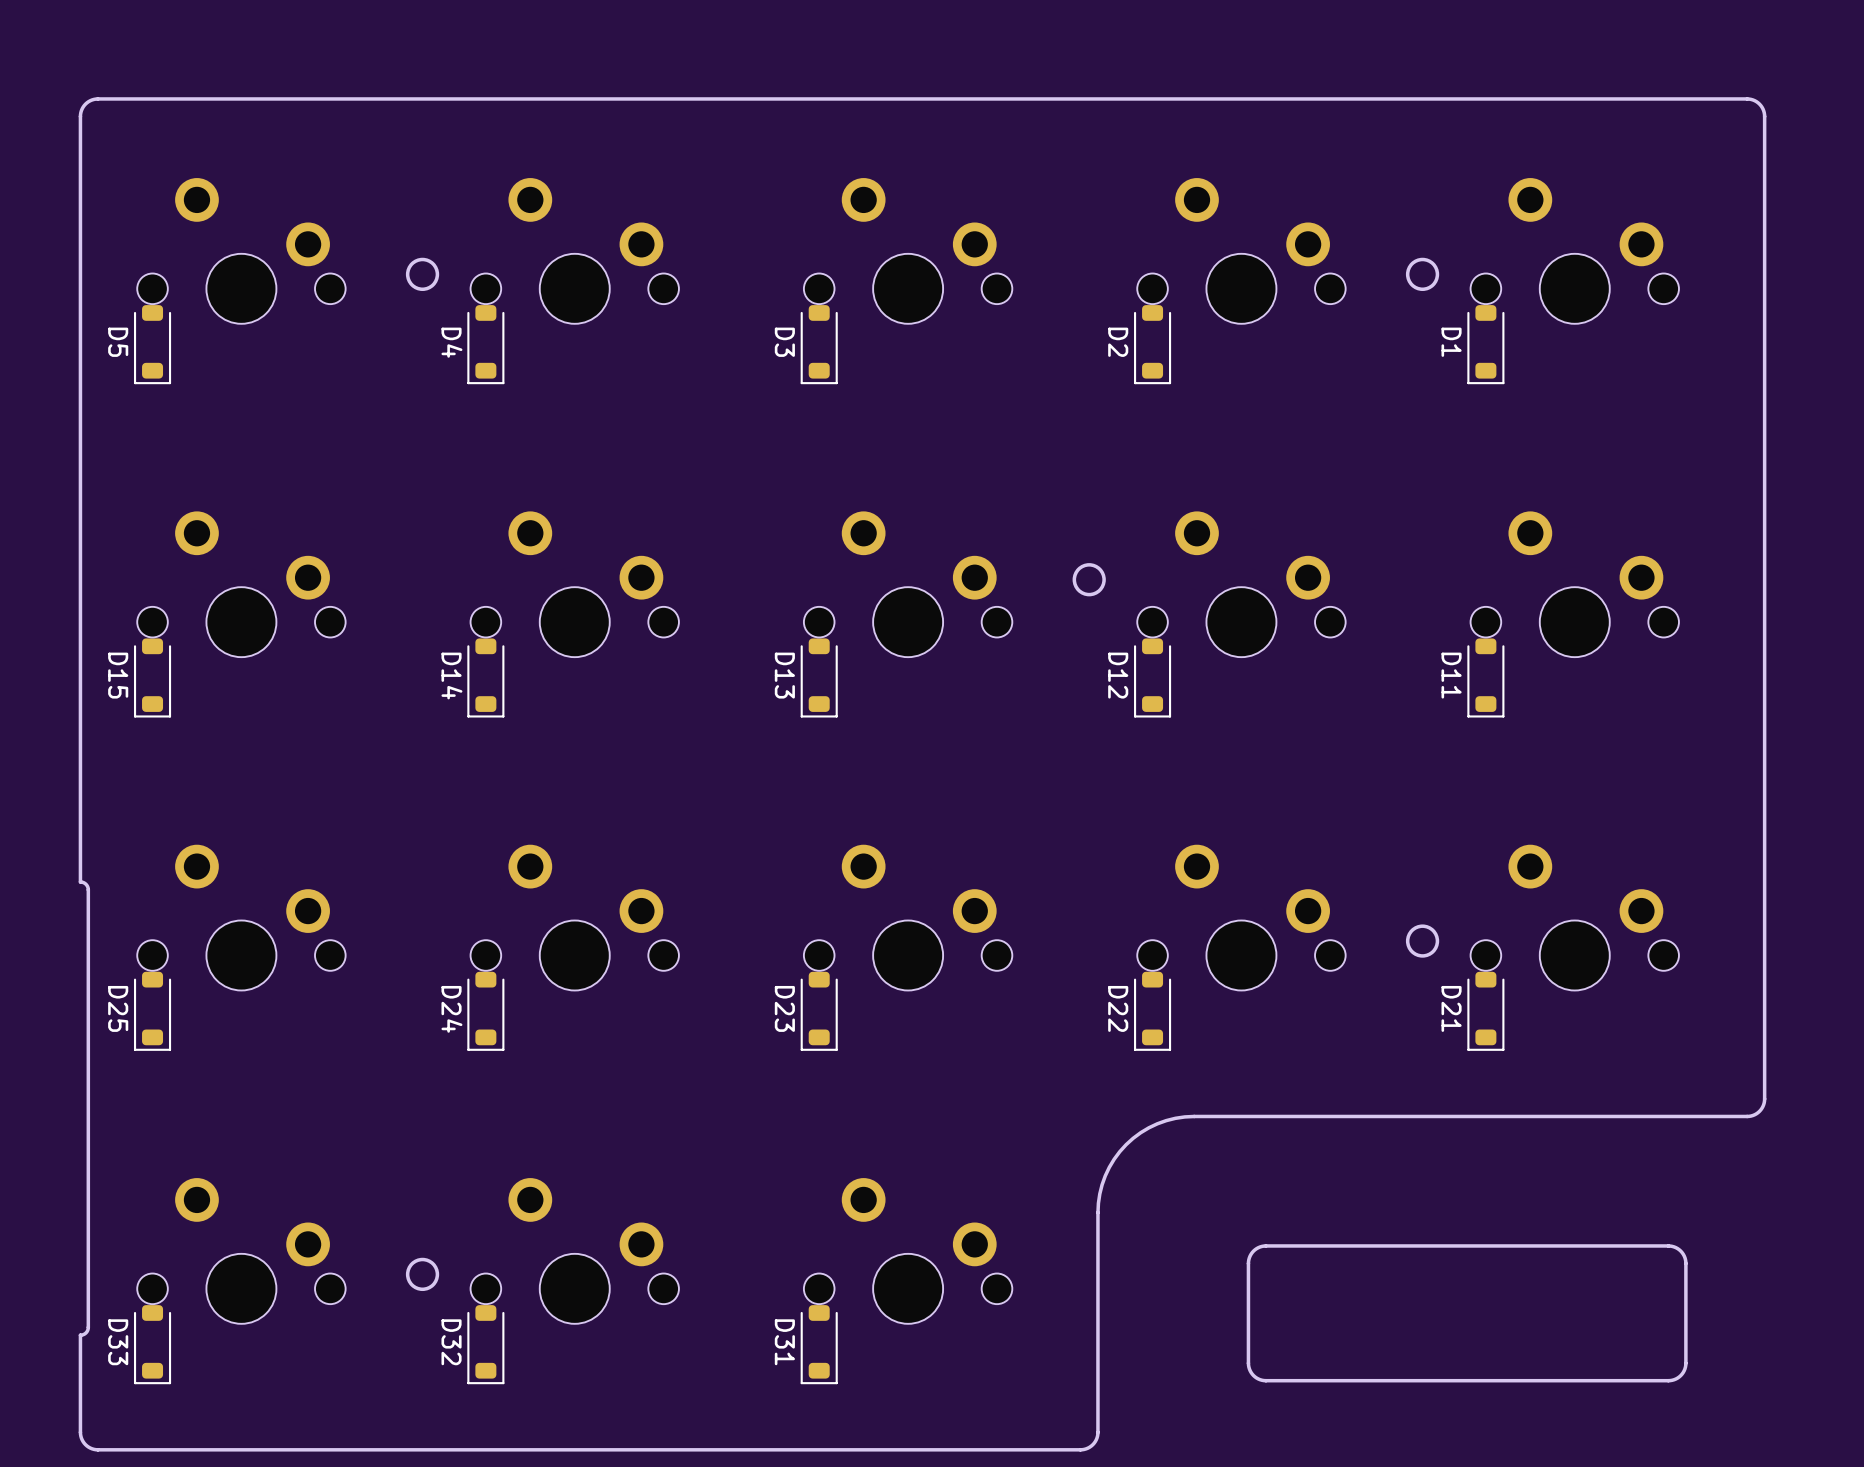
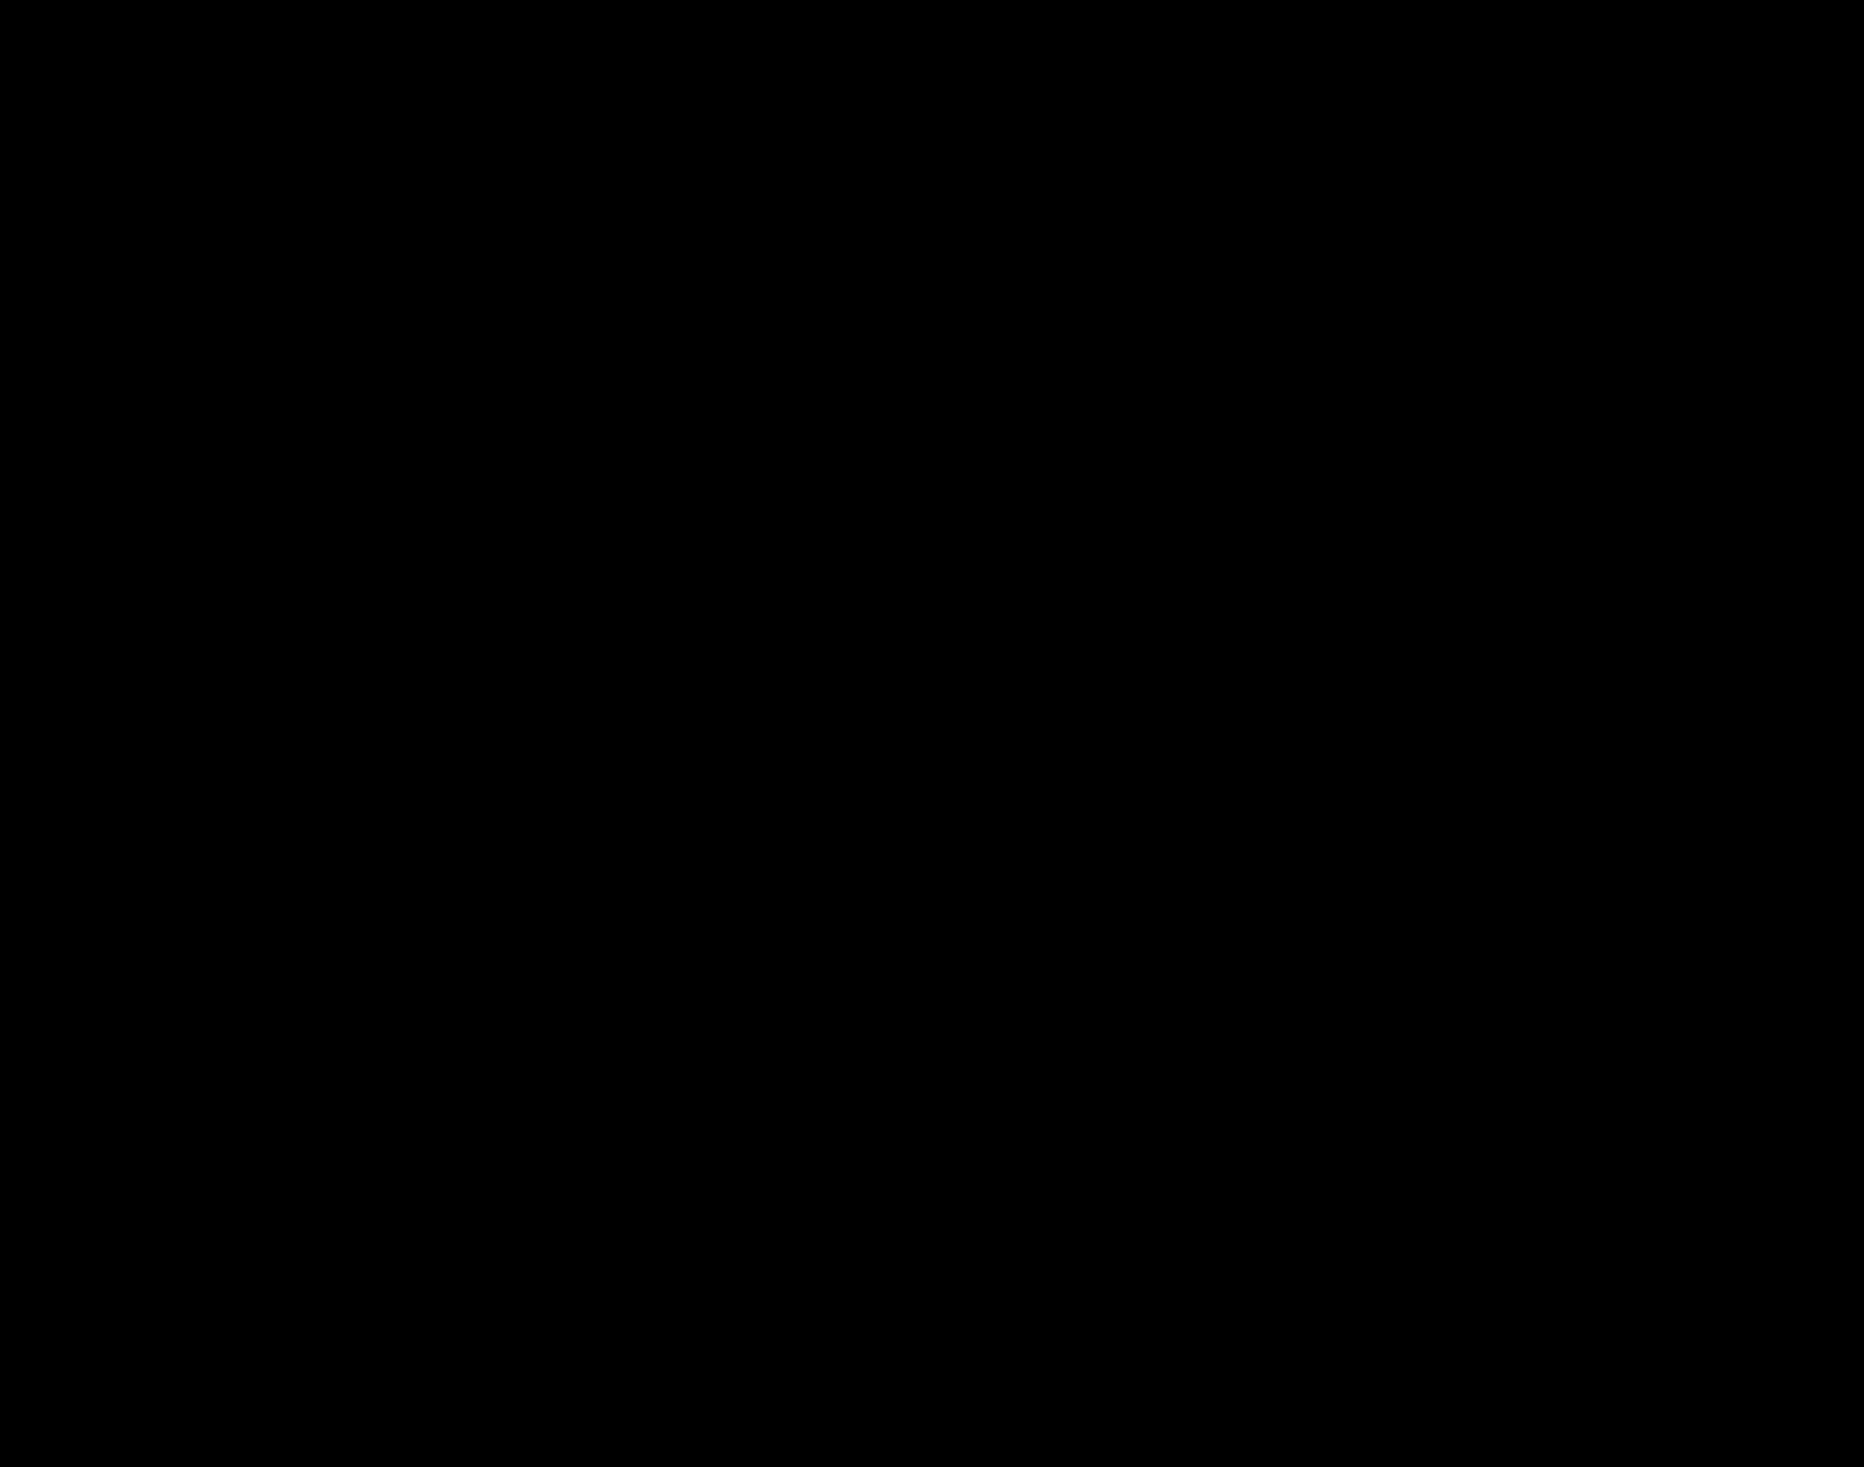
board edge: (1747, 98) (97, 98) (87, 102) (82, 108) (80, 116) (80, 882) (86, 884) (88, 889) (88, 1327) (86, 1332) (80, 1335) (80, 1432) (84, 1443) (90, 1448) (97, 1449) (1084, 1449) (1094, 1443) (1097, 1434) (1097, 1212) (1099, 1193) (1109, 1167) (1119, 1151) (1133, 1138) (1148, 1127) (1175, 1118) (1194, 1116) (1747, 1116) (1758, 1112) (1762, 1106) (1764, 1098) (1764, 116) (1759, 104) (1747, 98) -> none
part: (241, 250) -> none
part: (574, 250) -> none
part: (908, 250) -> none
part: (1241, 250) -> none
part: (1574, 250) -> none
round board edge: [405, 257, 440, 292] -> none
round board edge: [1405, 257, 1440, 292] -> none
D5: (152, 344) -> none
D4: (485, 344) -> none
D3: (819, 344) -> none
D2: (1152, 344) -> none
D1: (1485, 344) -> none
round board edge: [1072, 563, 1106, 597] -> none
part: (241, 584) -> none
part: (574, 584) -> none
part: (908, 584) -> none
part: (1241, 584) -> none
part: (1574, 584) -> none
D15: (152, 677) -> none
D14: (485, 677) -> none
D13: (819, 677) -> none
D12: (1152, 677) -> none
D11: (1485, 677) -> none
part: (241, 917) -> none
part: (574, 917) -> none
part: (908, 917) -> none
part: (1241, 917) -> none
part: (1574, 917) -> none
round board edge: [1405, 924, 1440, 958] -> none
D25: (152, 1011) -> none
D24: (485, 1011) -> none
D23: (819, 1011) -> none
D22: (1152, 1011) -> none
D21: (1485, 1011) -> none
board edge: (1668, 1245) (1260, 1246) (1252, 1252) (1248, 1261) (1249, 1368) (1255, 1376) (1265, 1380) (1674, 1379) (1682, 1374) (1685, 1365) (1685, 1263) (1680, 1251) (1668, 1245) -> none
part: (241, 1250) -> none
part: (574, 1250) -> none
part: (908, 1250) -> none
round board edge: [405, 1257, 440, 1292] -> none
D33: (152, 1344) -> none
D32: (485, 1344) -> none
D31: (819, 1344) -> none

